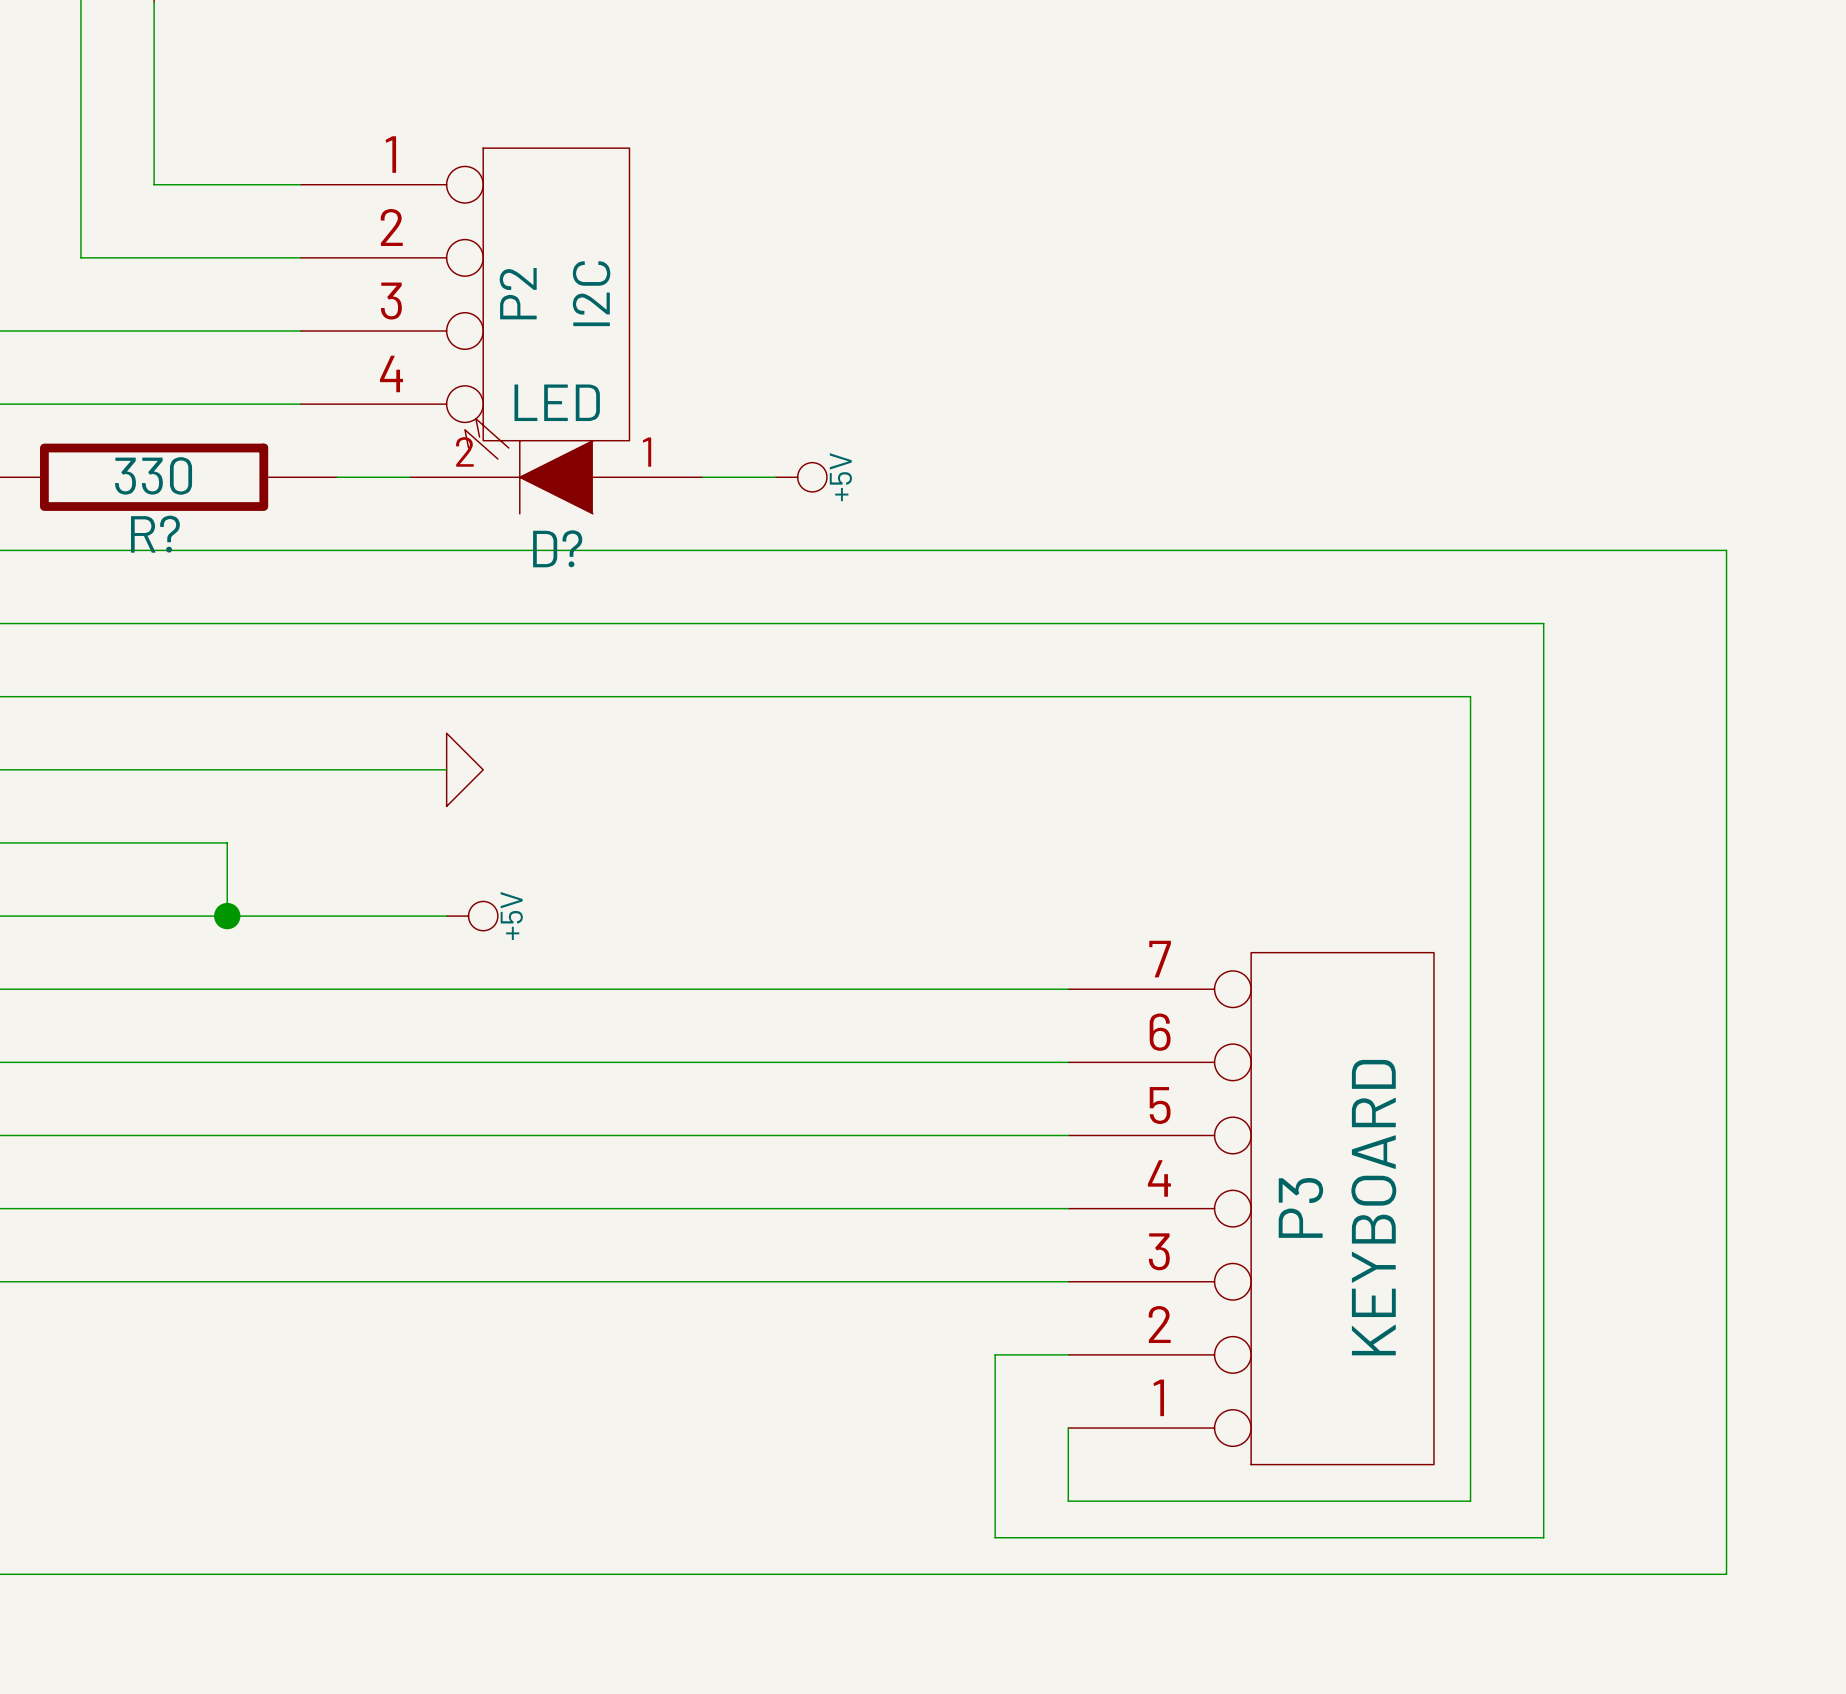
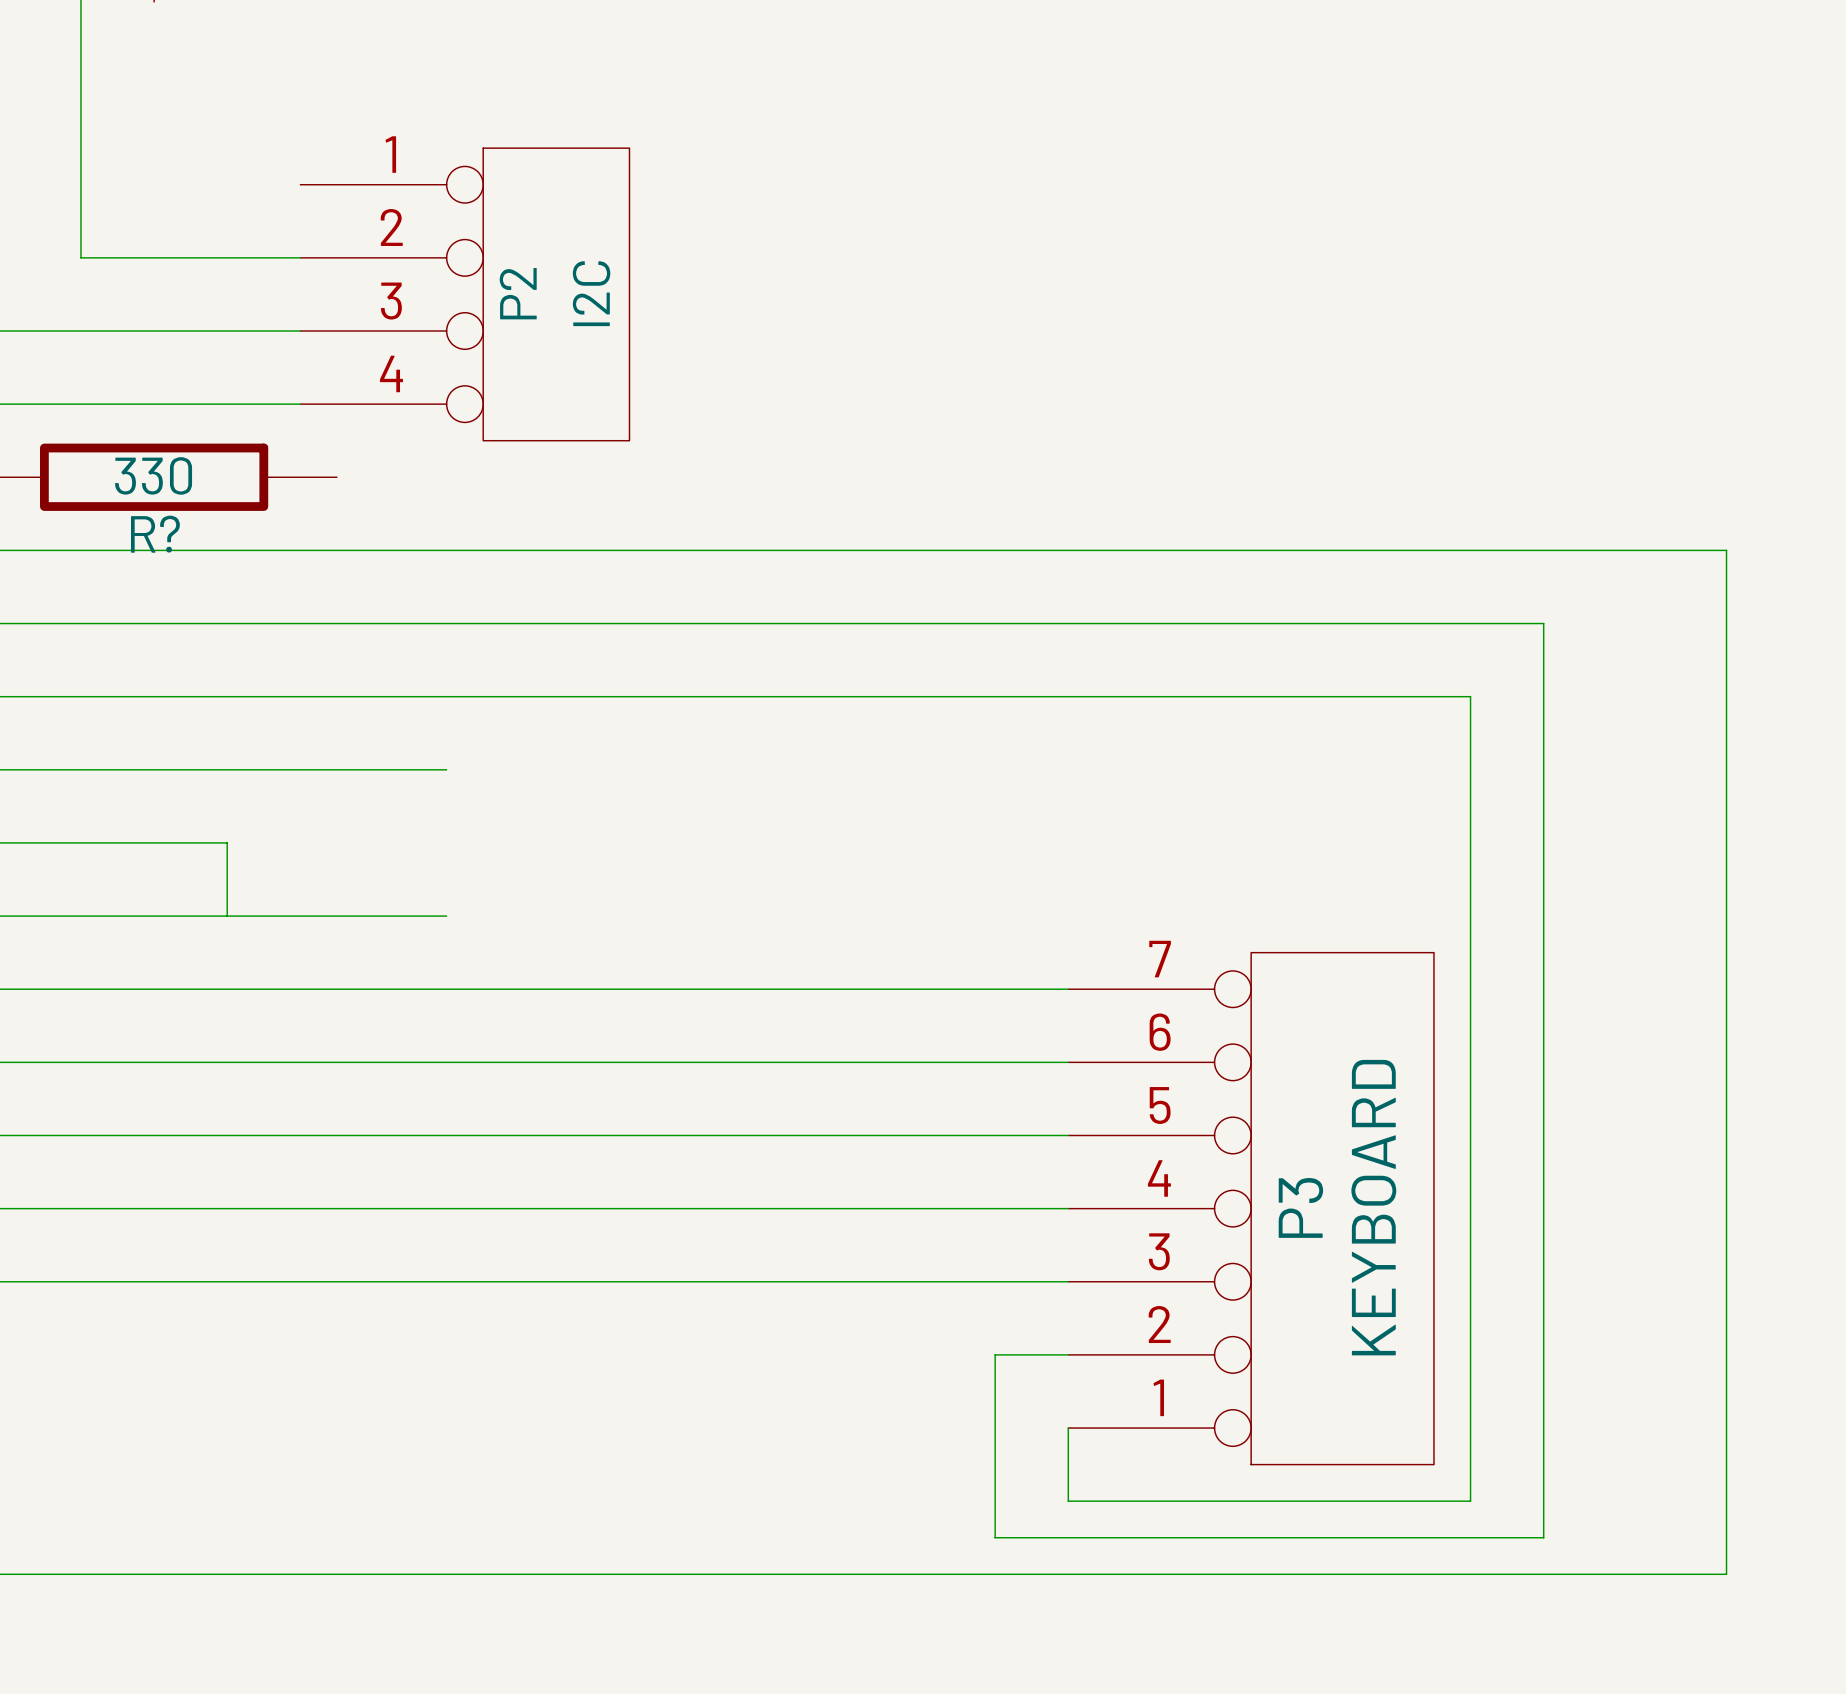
wire: (154, 1) (154, 184) (300, 184) -> none
D?: LED (556, 466) -> none
wire: (336, 477) (410, 477) -> none
wire: (702, 477) (775, 477) -> none
power symbol: +5V (801, 477) -> none
power symbol: (464, 769) -> none
junction: (227, 916) -> none
power symbol: +5V (472, 916) -> none

